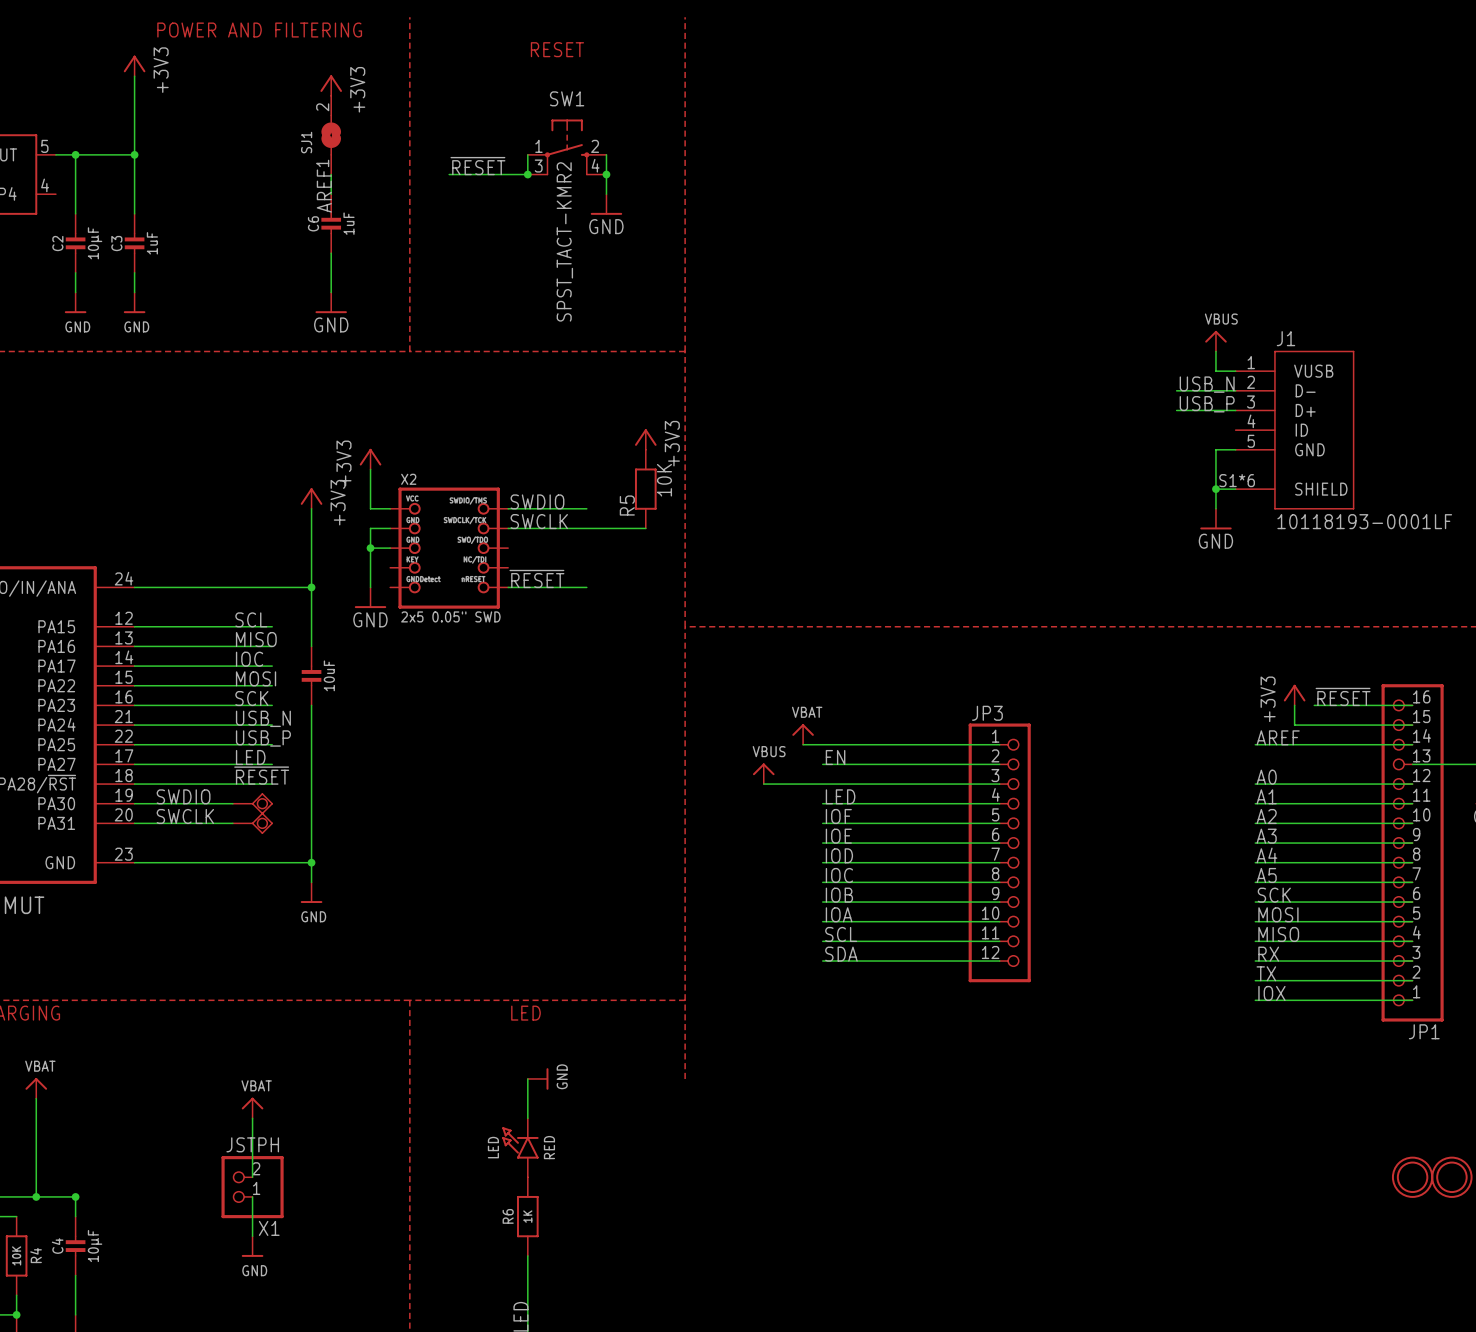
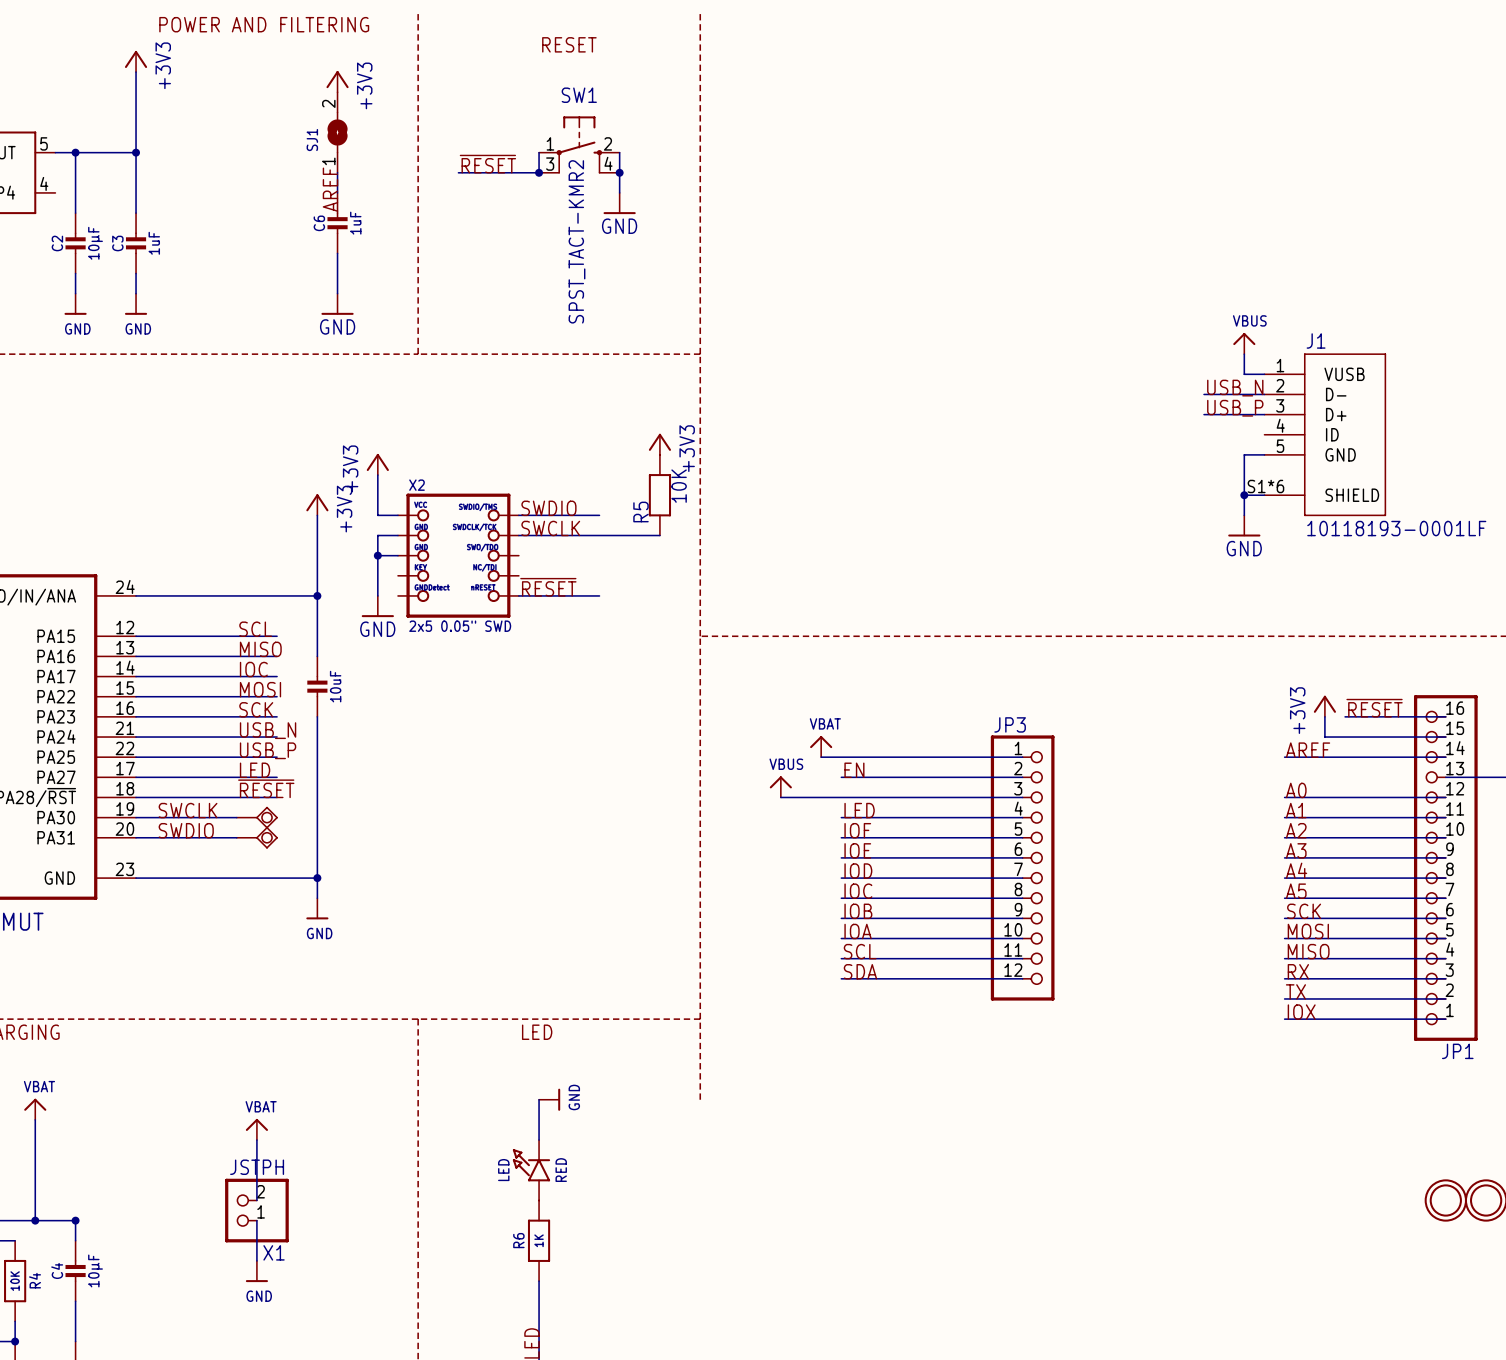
label: SWDIO (183, 796) -> SWCLK (188, 810)
label: SWCLK (185, 816) -> SWDIO (186, 830)

